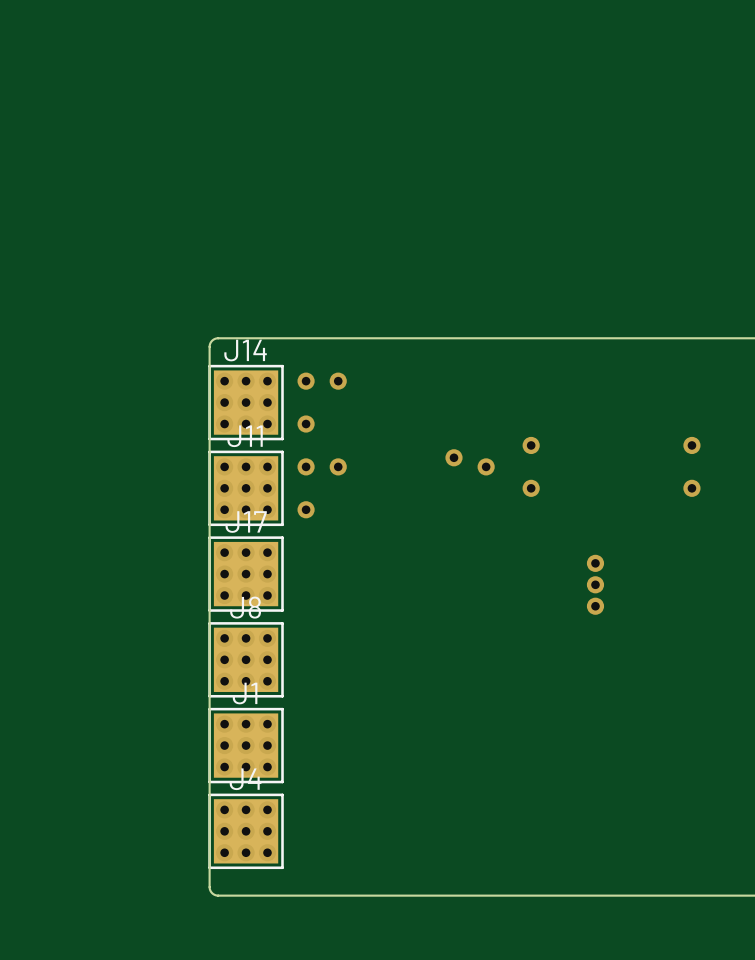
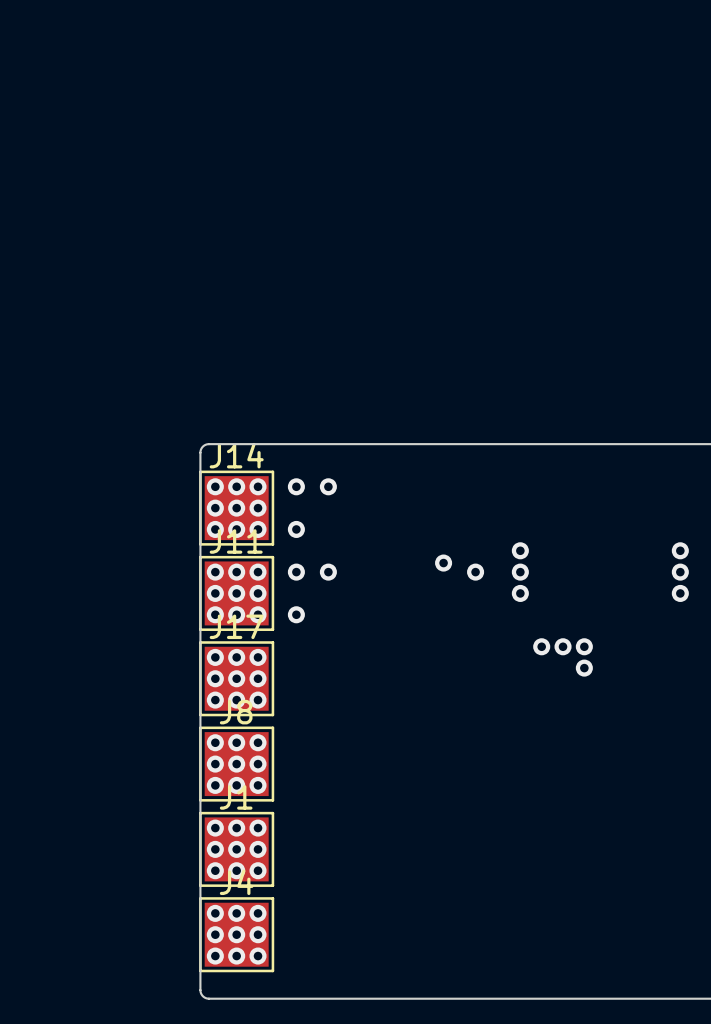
via: none -> (520, 572)
via: none -> (680, 572)
via: none -> (541, 646)
via: none -> (563, 646)
via: none -> (584, 646)
via: (595, 584) -> none
via: (595, 606) -> none

